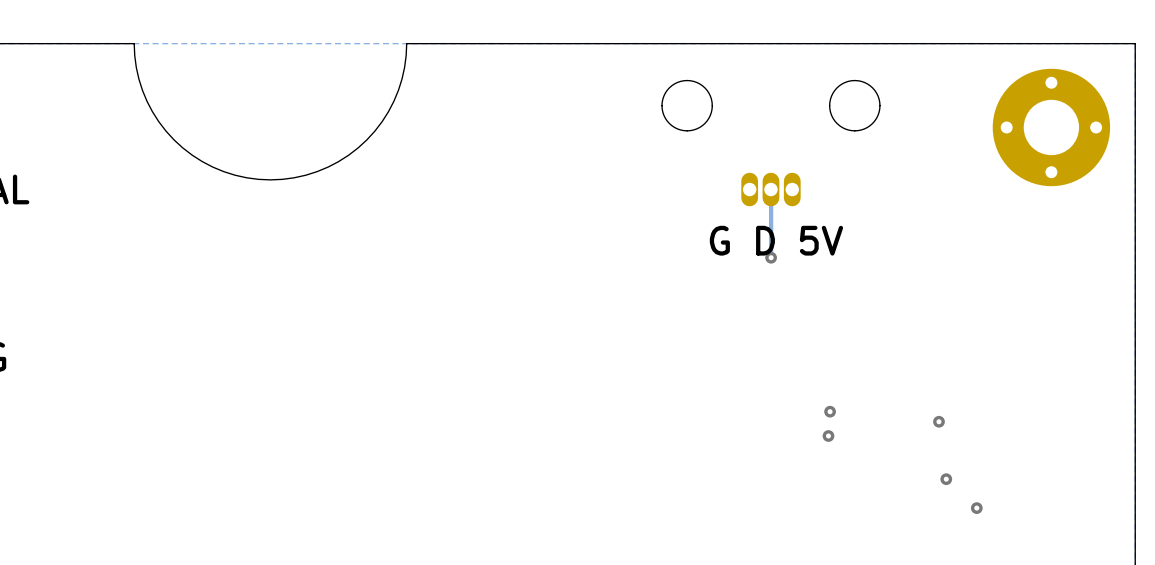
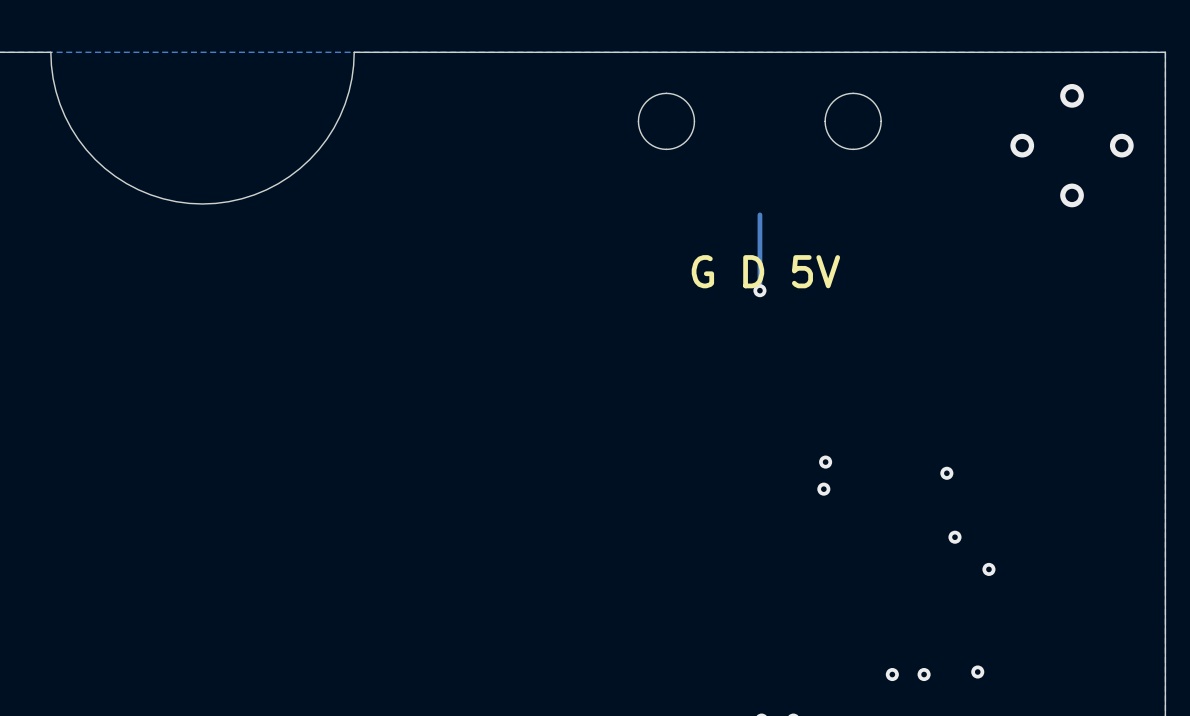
part: (1051, 127) -> none
part: (770, 189) -> none

